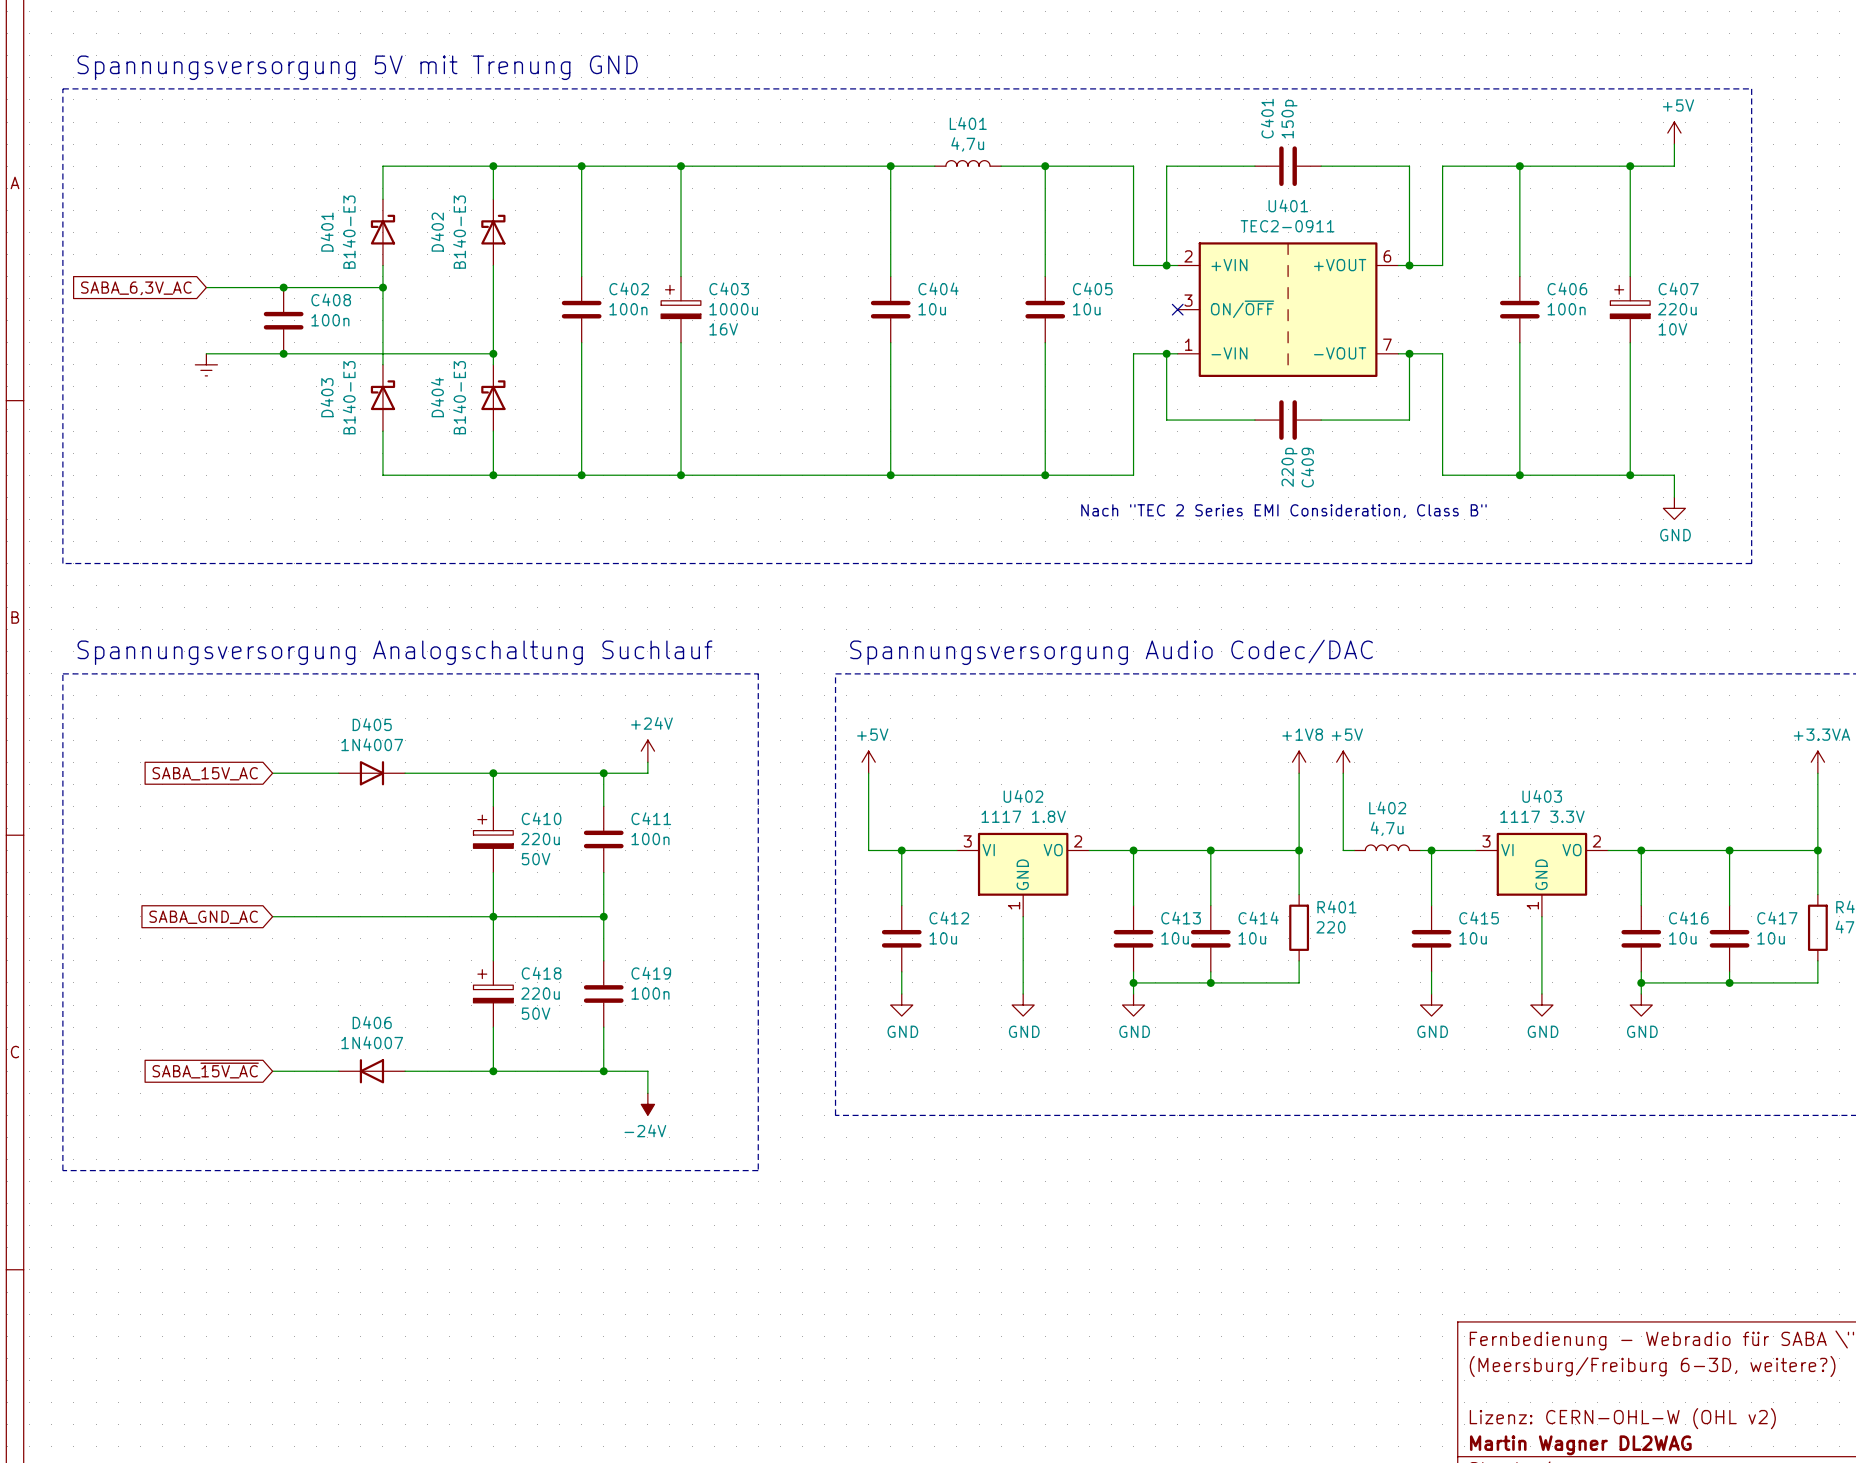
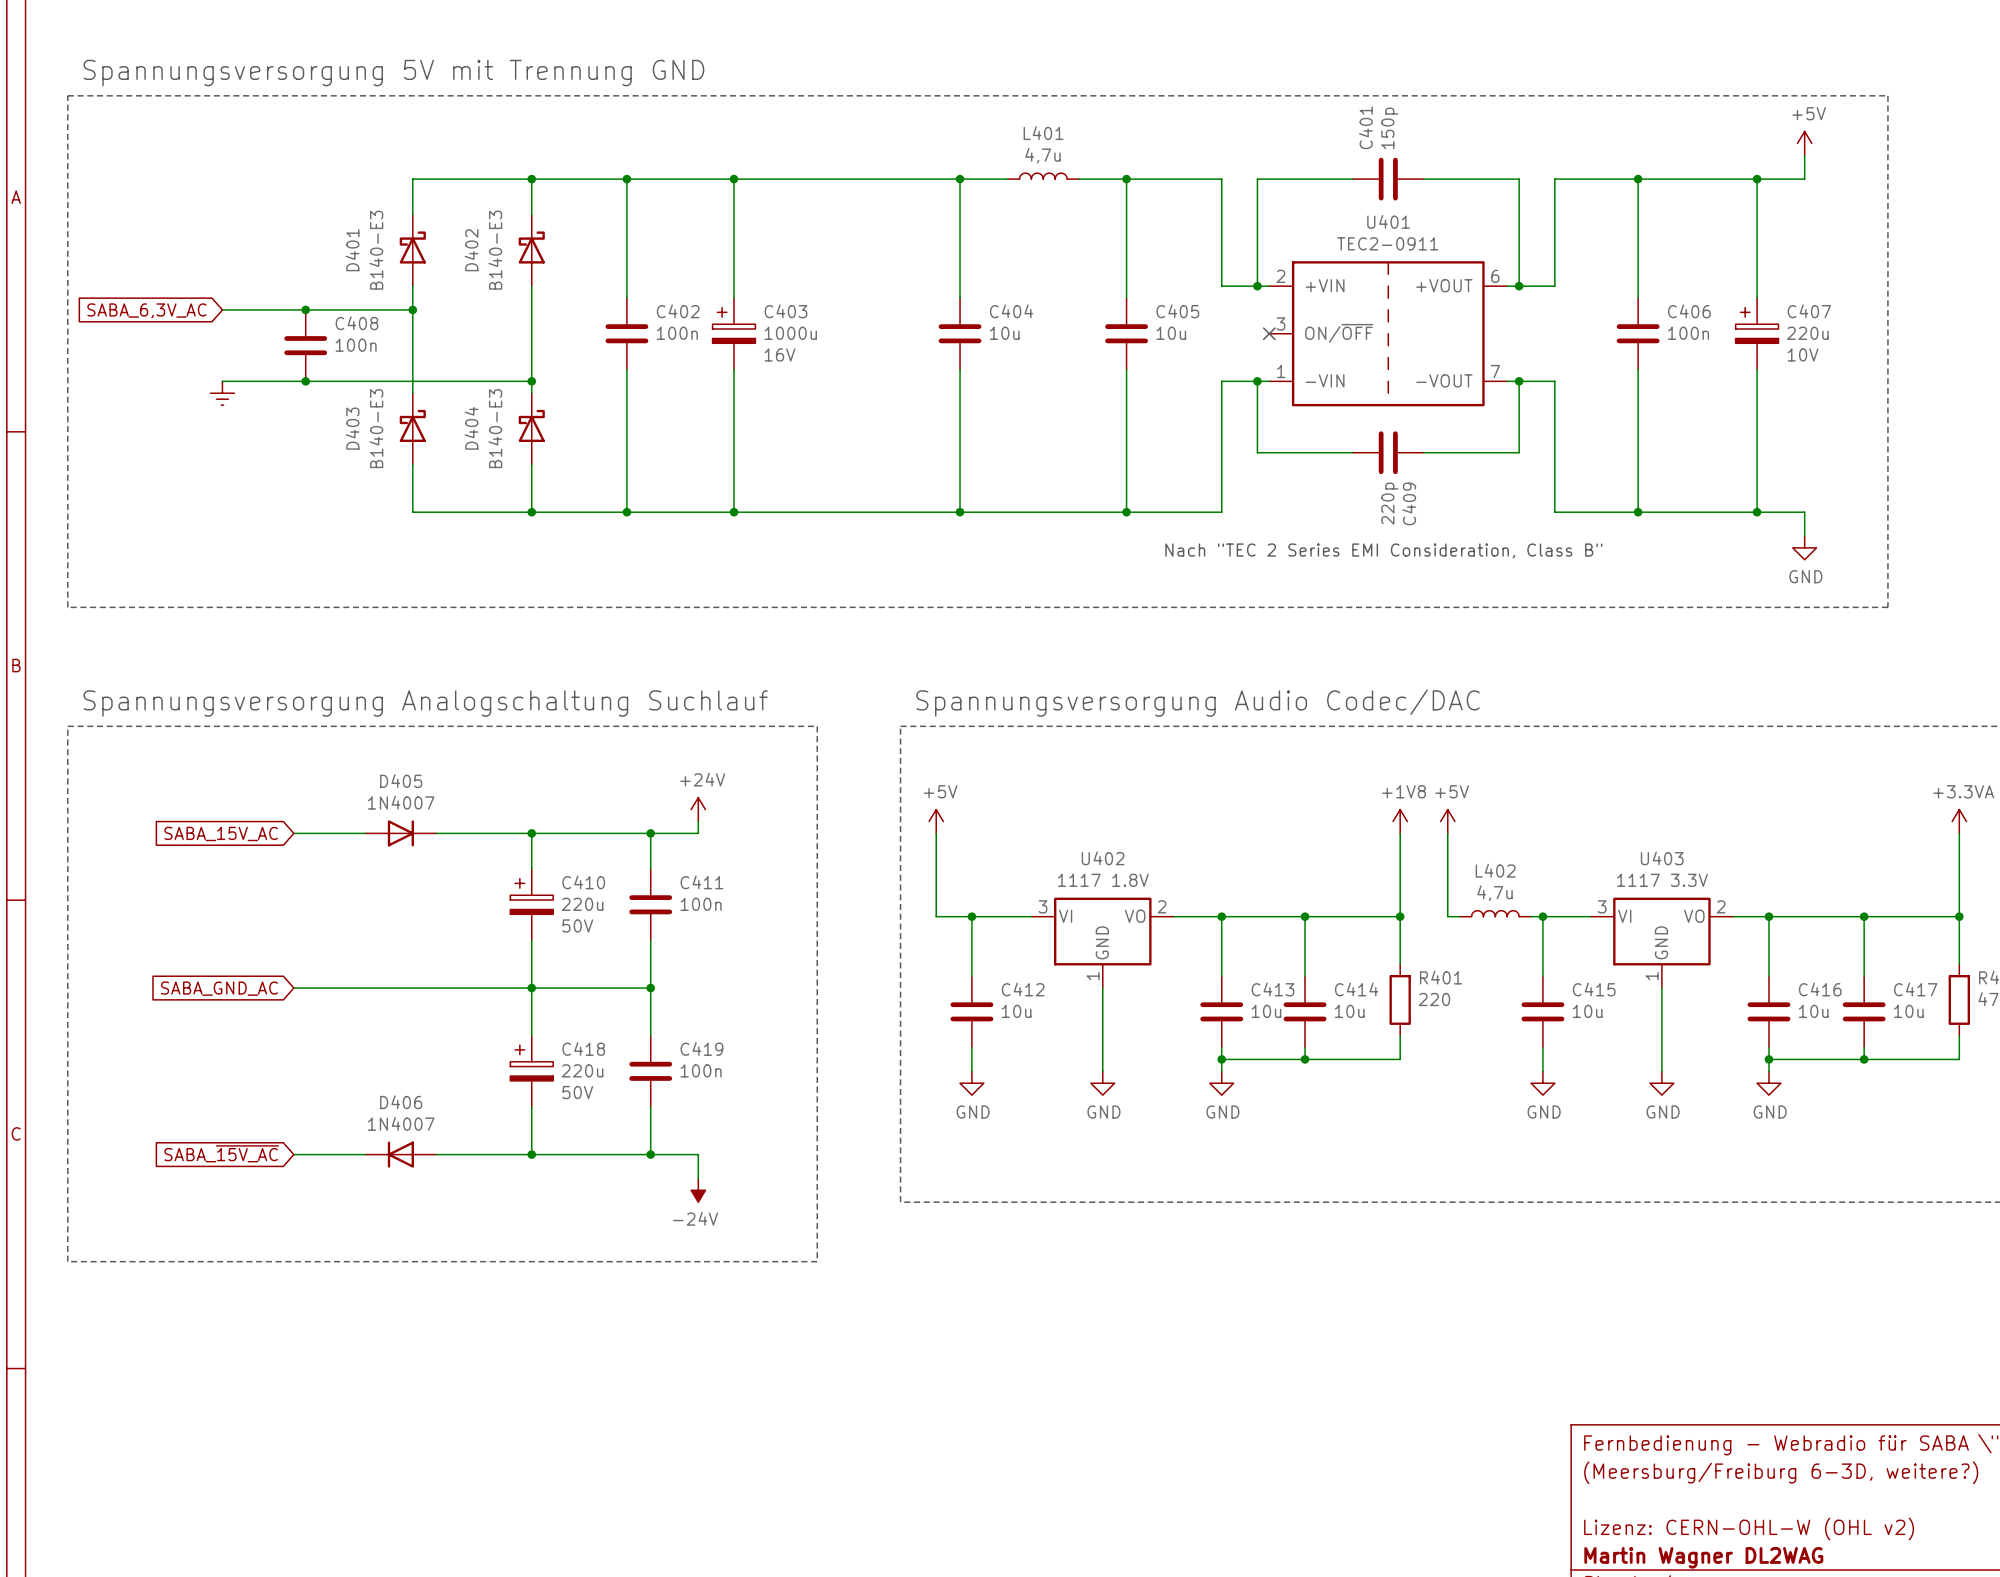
text: Spannungsversorgung 5V mit Trenung GND (357, 67) -> Spannungsversorgung 5V mit Trennung GND (393, 73)

